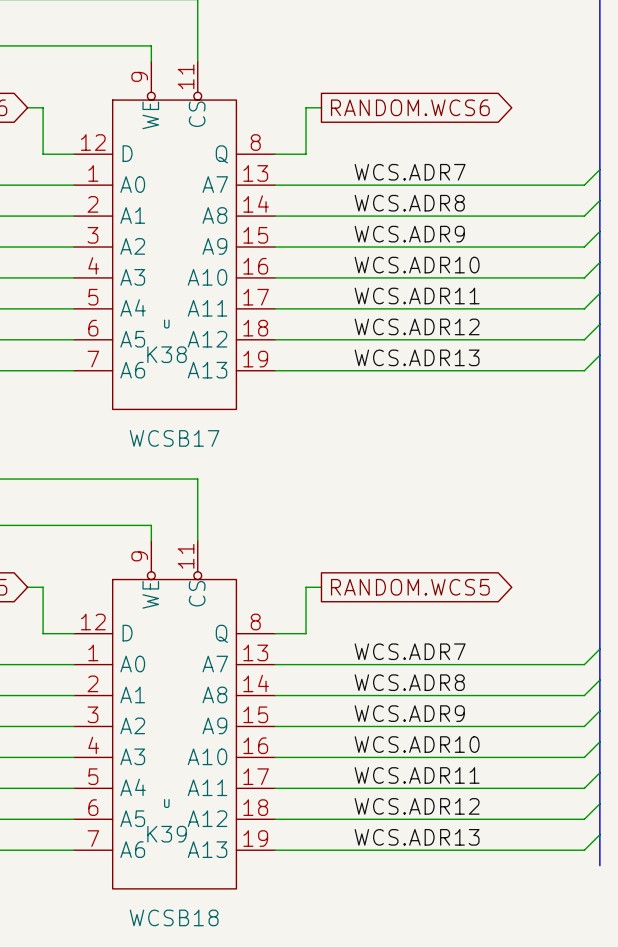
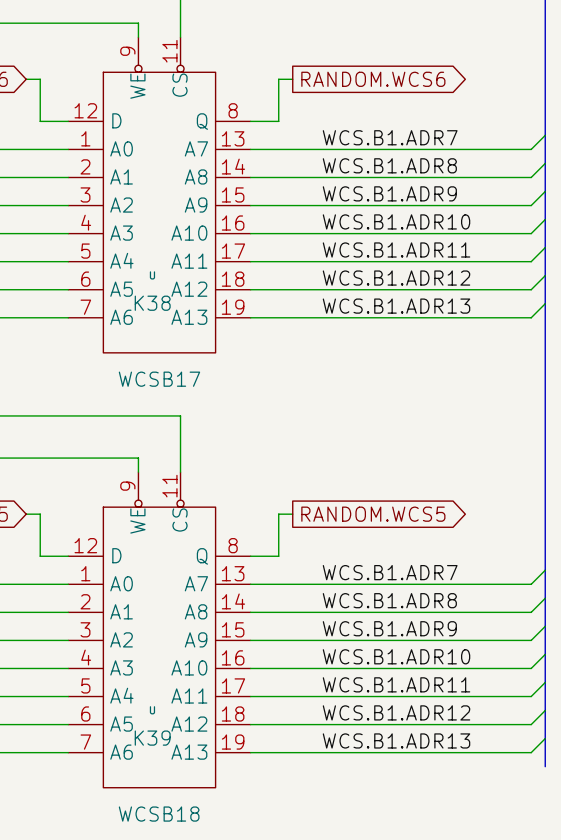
label: WCS.ADR7 (410, 172) -> WCS.B1.ADR7 (390, 137)
label: WCS.ADR8 (409, 203) -> WCS.B1.ADR8 (389, 165)
label: WCS.ADR9 (409, 234) -> WCS.B1.ADR9 (389, 193)
label: WCS.ADR10 (417, 265) -> WCS.B1.ADR10 (396, 221)
label: WCS.ADR11 (417, 296) -> WCS.B1.ADR11 (396, 249)
label: WCS.ADR12 (417, 326) -> WCS.B1.ADR12 (396, 278)
label: WCS.ADR13 (417, 357) -> WCS.B1.ADR13 (396, 306)
label: WCS.ADR7 (410, 651) -> WCS.B1.ADR7 (390, 572)
label: WCS.ADR8 (409, 682) -> WCS.B1.ADR8 (389, 600)
label: WCS.ADR9 (409, 713) -> WCS.B1.ADR9 (389, 628)
label: WCS.ADR10 (417, 744) -> WCS.B1.ADR10 (396, 656)
label: WCS.ADR11 (417, 775) -> WCS.B1.ADR11 (396, 684)
label: WCS.ADR12 (417, 806) -> WCS.B1.ADR12 (396, 712)
label: WCS.ADR13 (417, 837) -> WCS.B1.ADR13 (396, 740)

